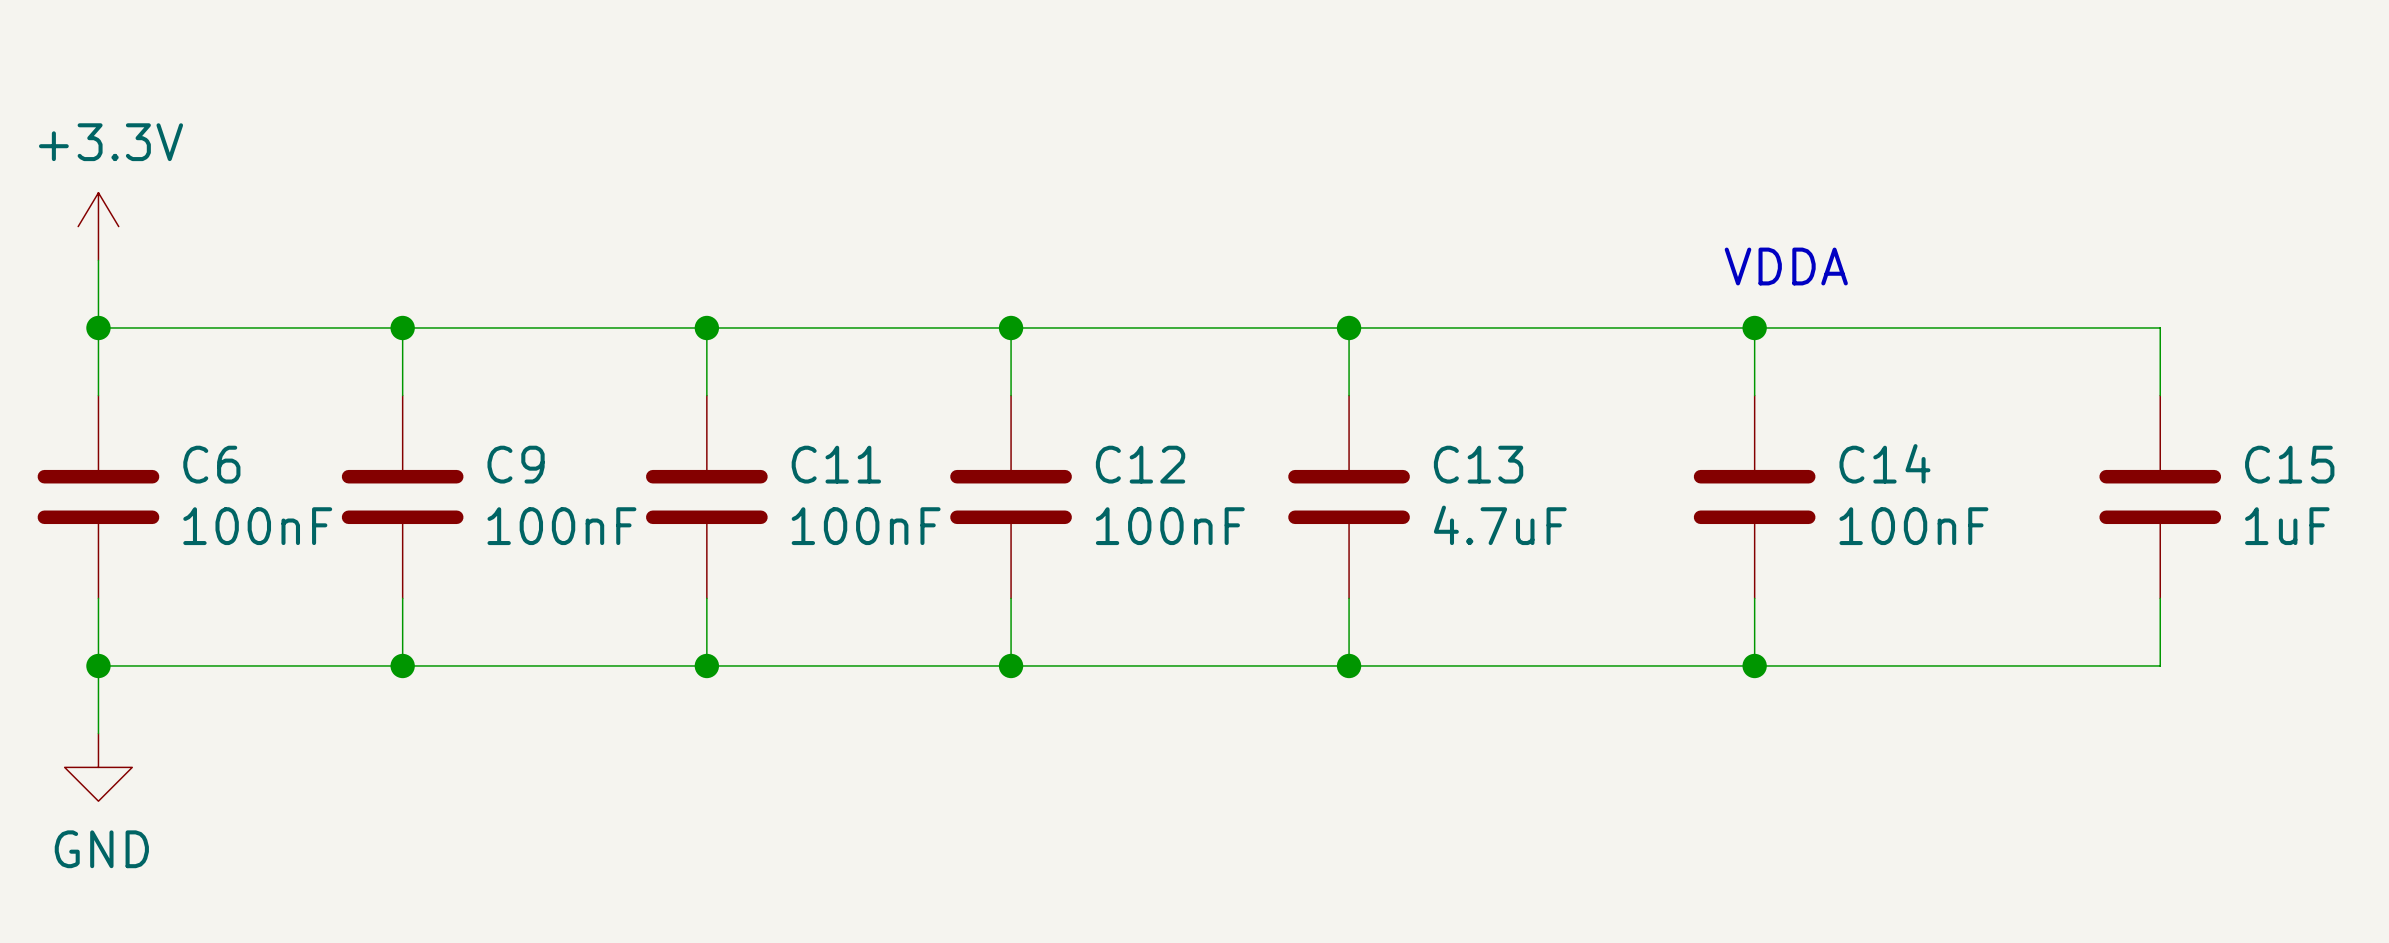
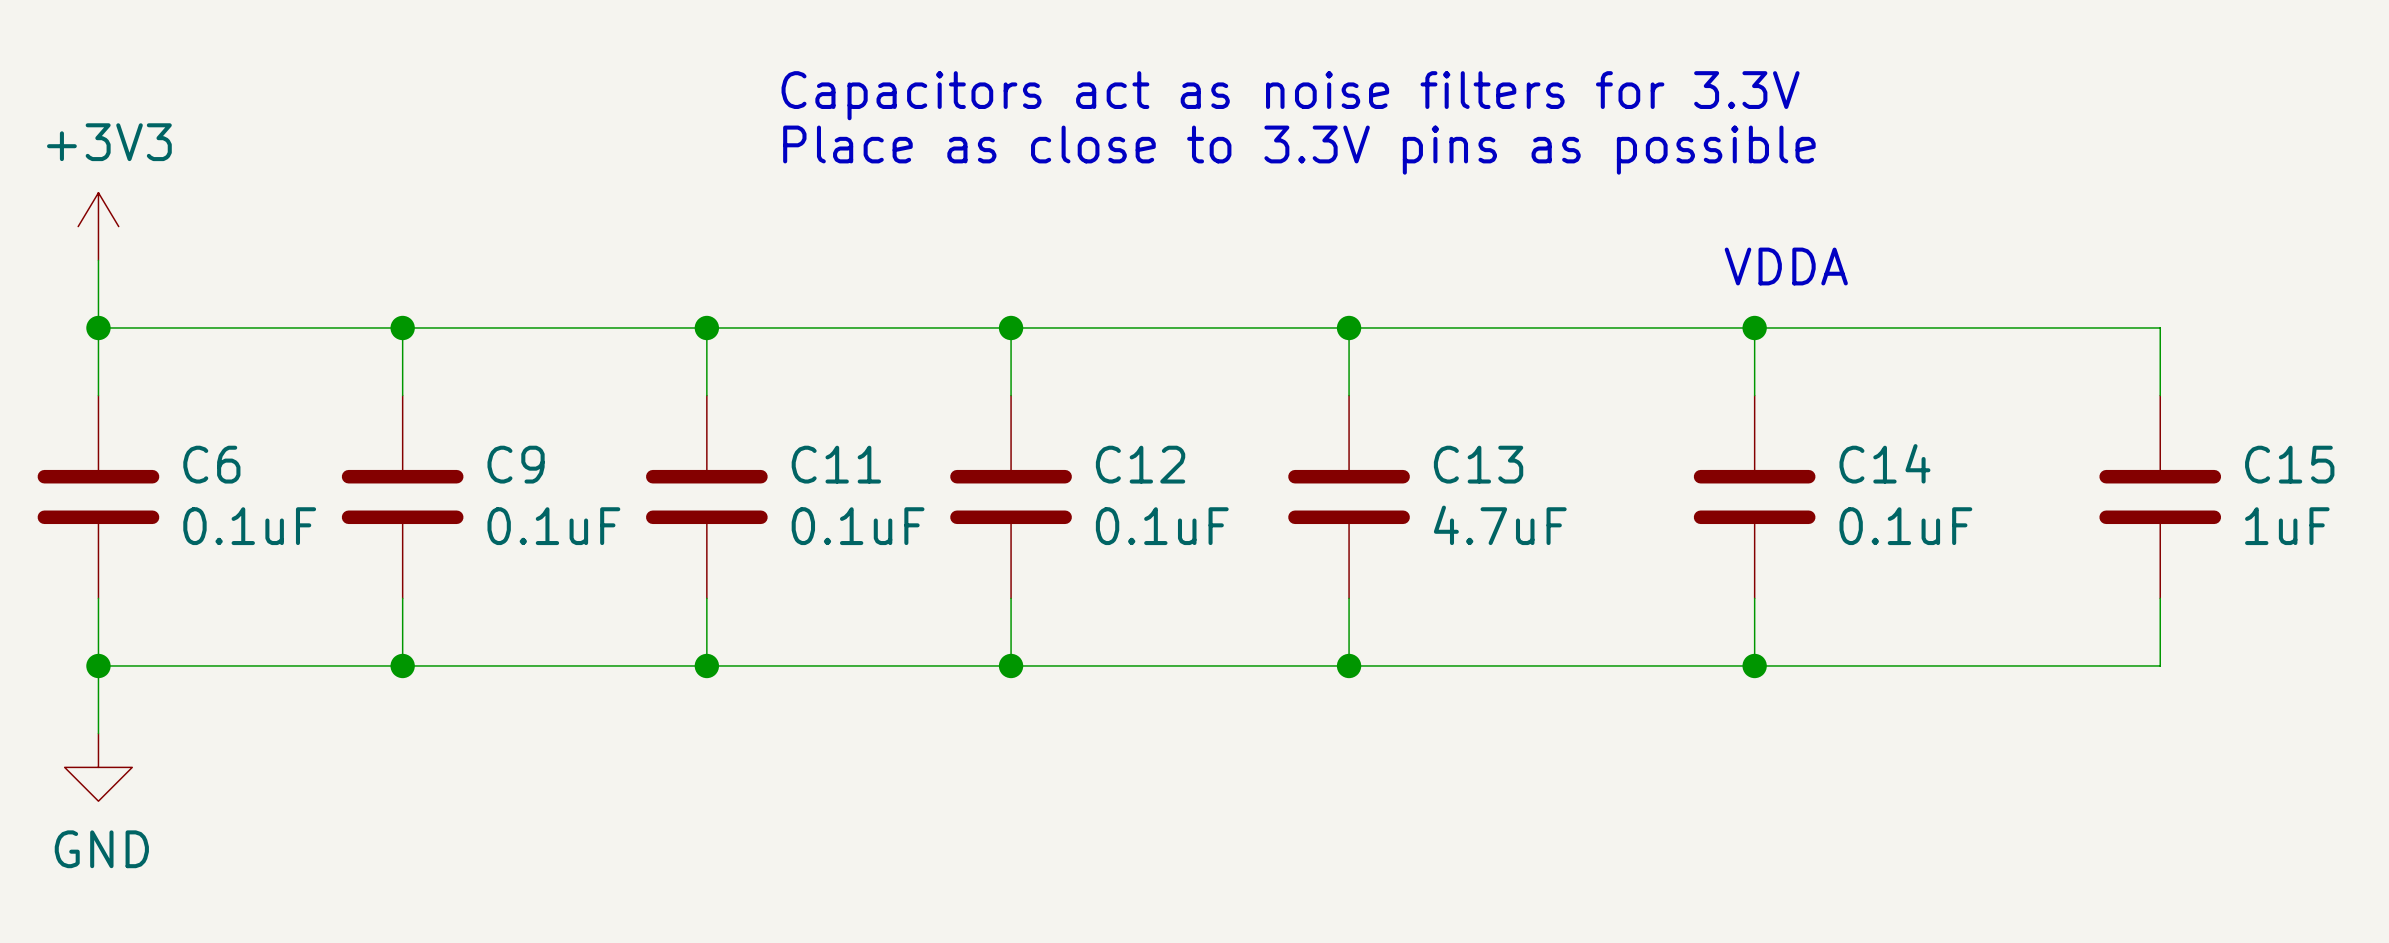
text: none -> Capacitors act as noise filters for 3.3V (1290, 95)
text: none -> Place as close to 3.3V pins as possible (1299, 150)
power symbol: +3.3V (98, 226) -> +3V3 (98, 226)
C6 value: 100nF (257, 526) -> 0.1uF (249, 526)
C9 value: 100nF (561, 526) -> 0.1uF (553, 526)
C11 value: 100nF (866, 526) -> 0.1uF (858, 526)
C12 value: 100nF (1170, 526) -> 0.1uF (1162, 526)
C14 value: 100nF (1913, 526) -> 0.1uF (1905, 526)

